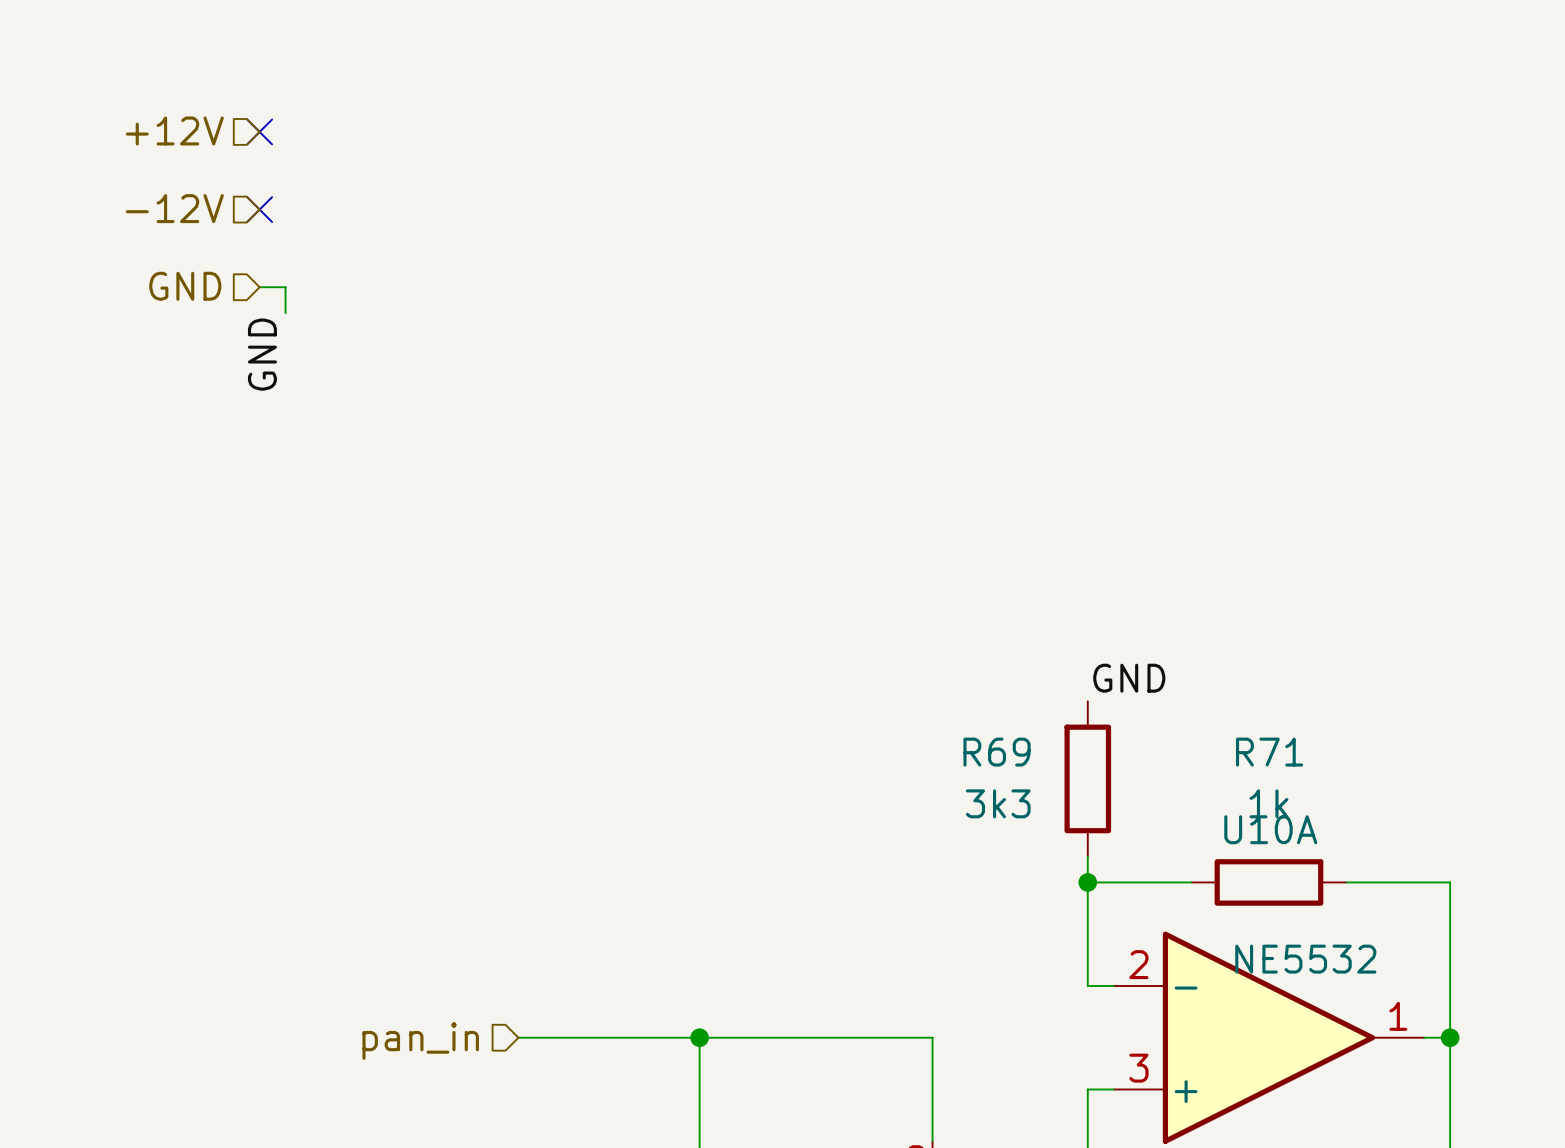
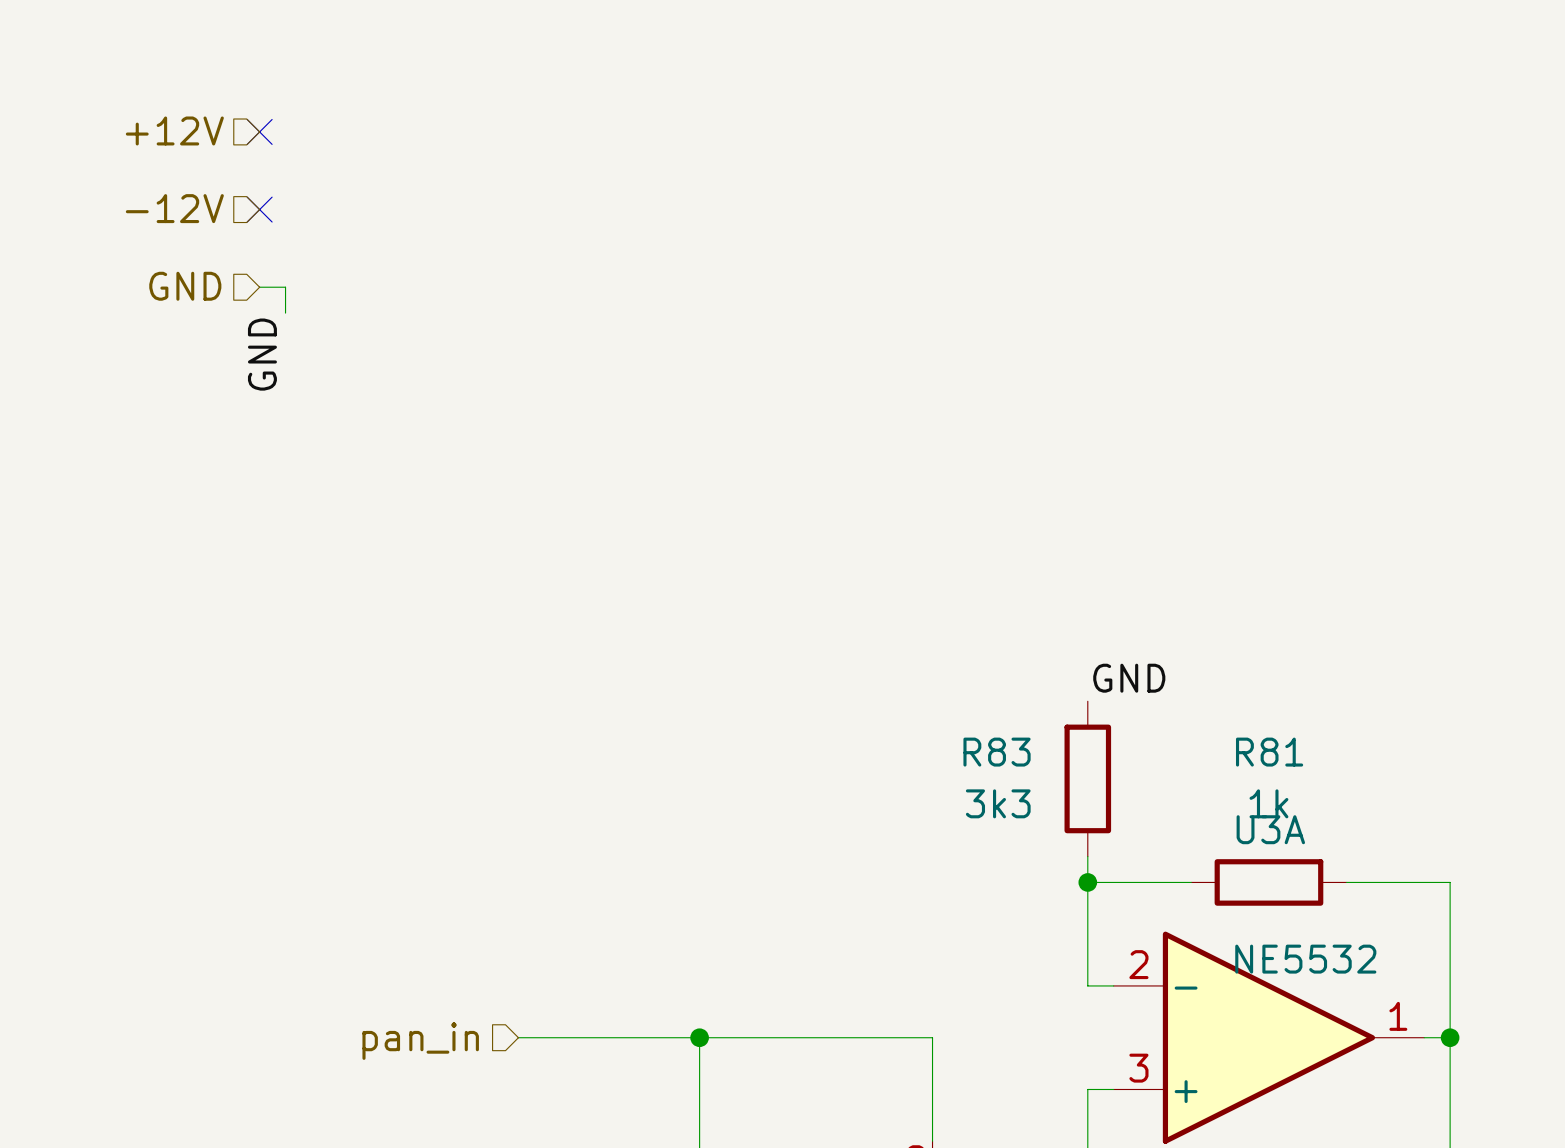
R69 name: R69 (997, 752) -> R83 (997, 752)
R71 name: R71 (1269, 752) -> R81 (1269, 752)
U10A name: U10A (1270, 829) -> U3A (1270, 829)

